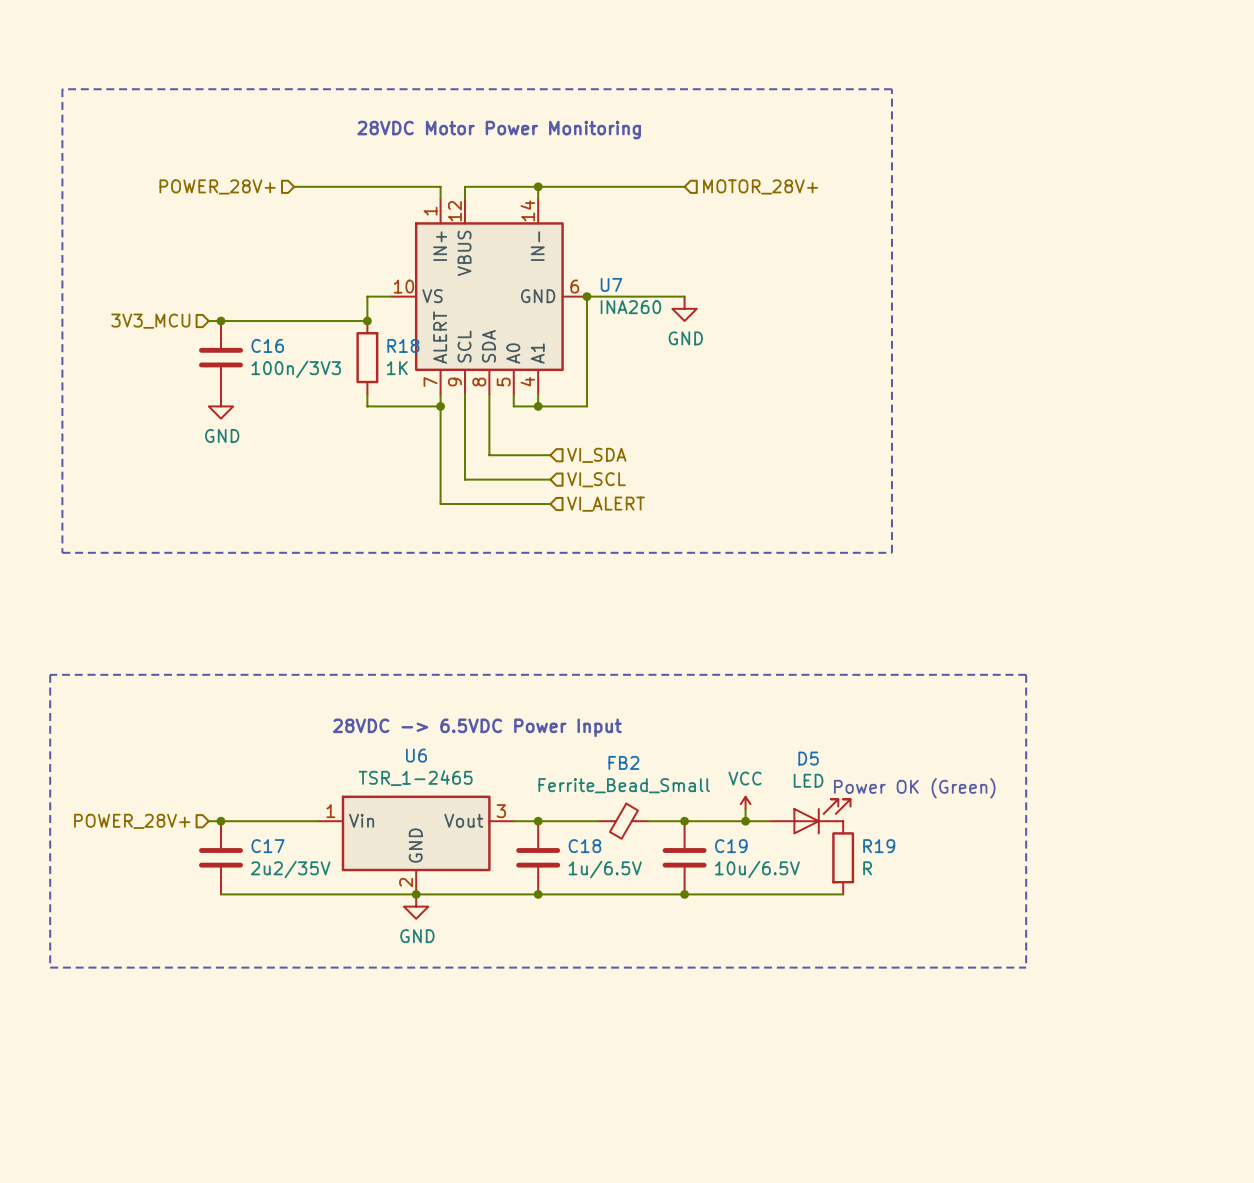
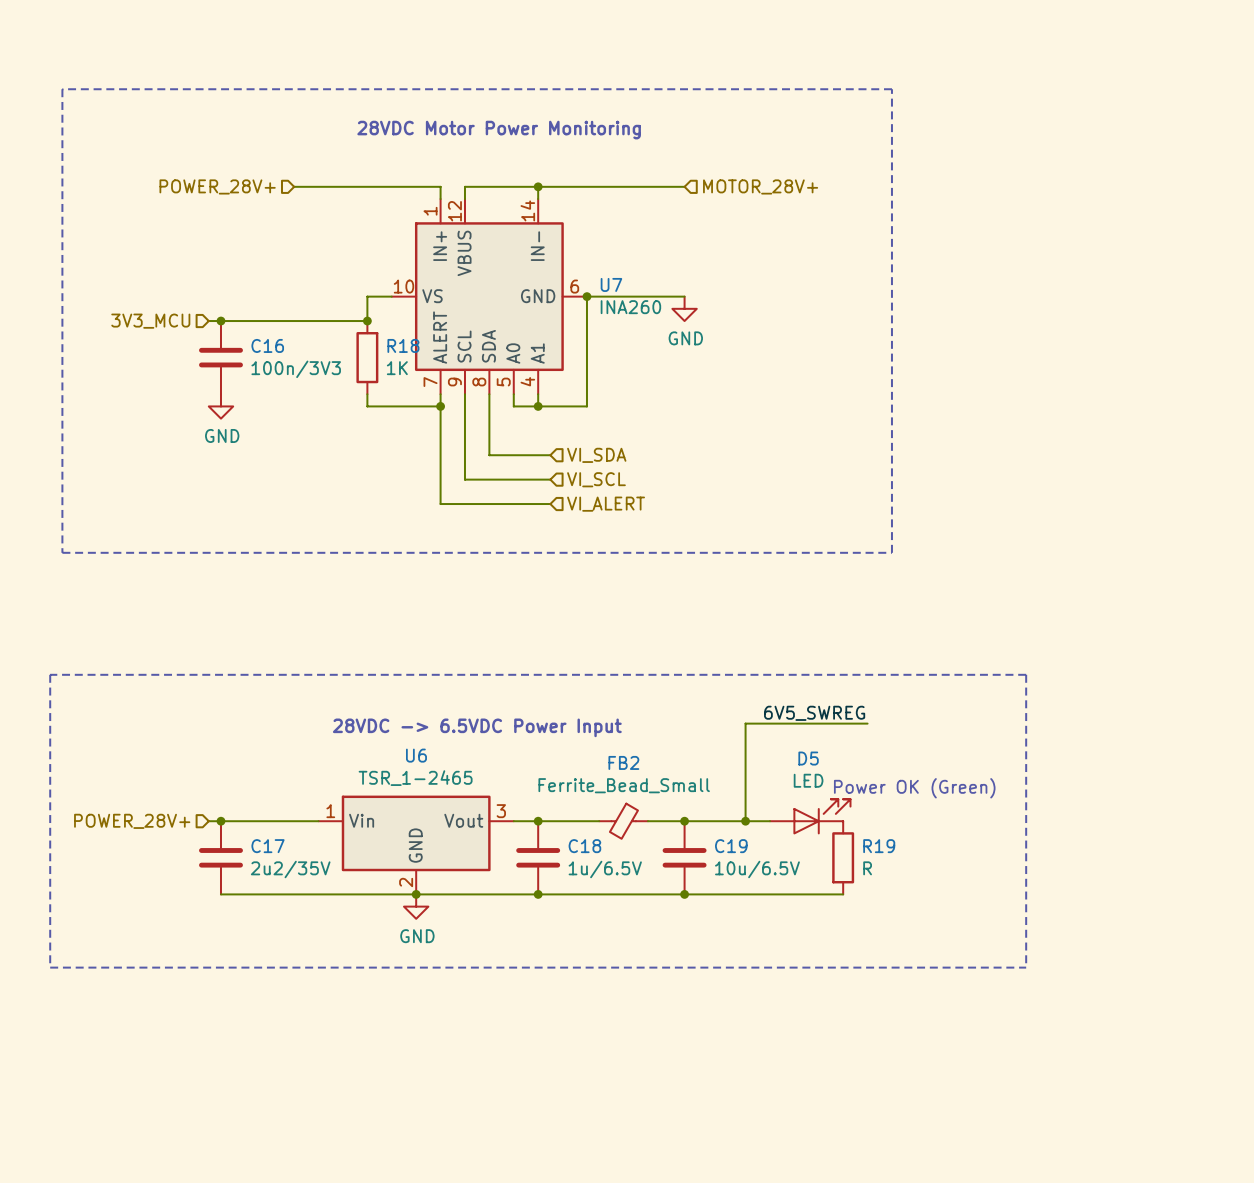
label: none -> 6V5_SWREG (814, 713)
wire: none -> (867, 723) (745, 723) (745, 809)
power symbol: VCC (745, 802) -> none

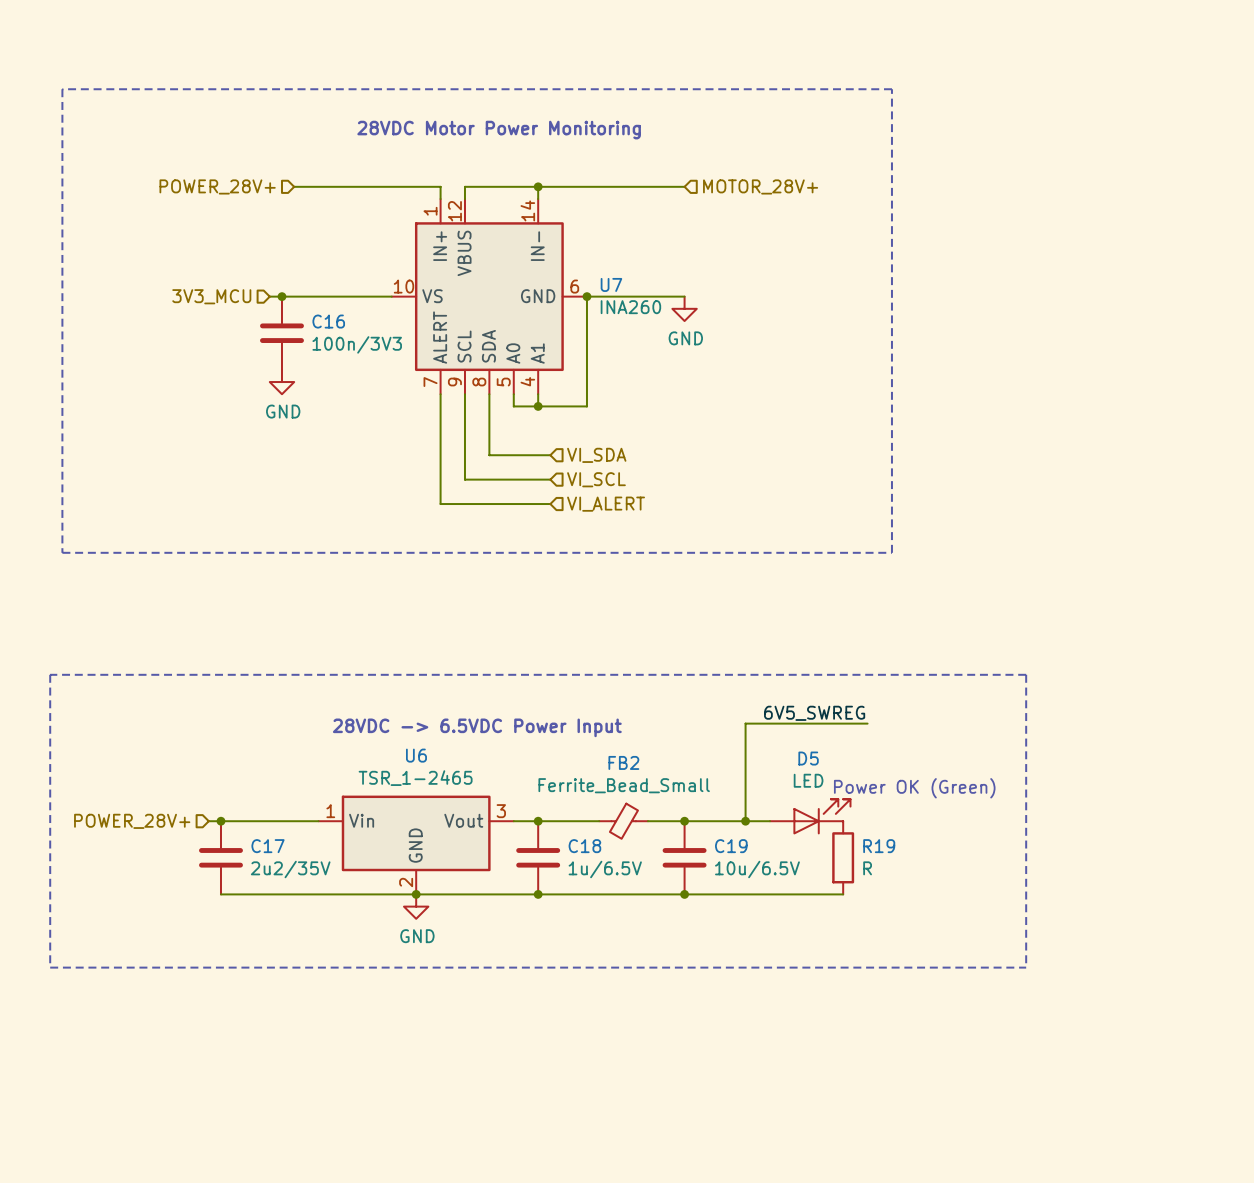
junction: none -> (281, 296)
wire: (367, 296) (367, 321) (208, 321) -> (367, 296) (269, 296)
hierarchical label position: 3V3_MCU (150, 321) -> 3V3_MCU (211, 296)
junction: (220, 321) -> none
junction: (367, 321) -> none
C16 position: (220, 357) -> (281, 333)
R18: 1K (367, 357) -> none
wire: (367, 394) (367, 406) (440, 406) -> none
power symbol position: GND (220, 406) -> GND (281, 382)
junction: (440, 406) -> none

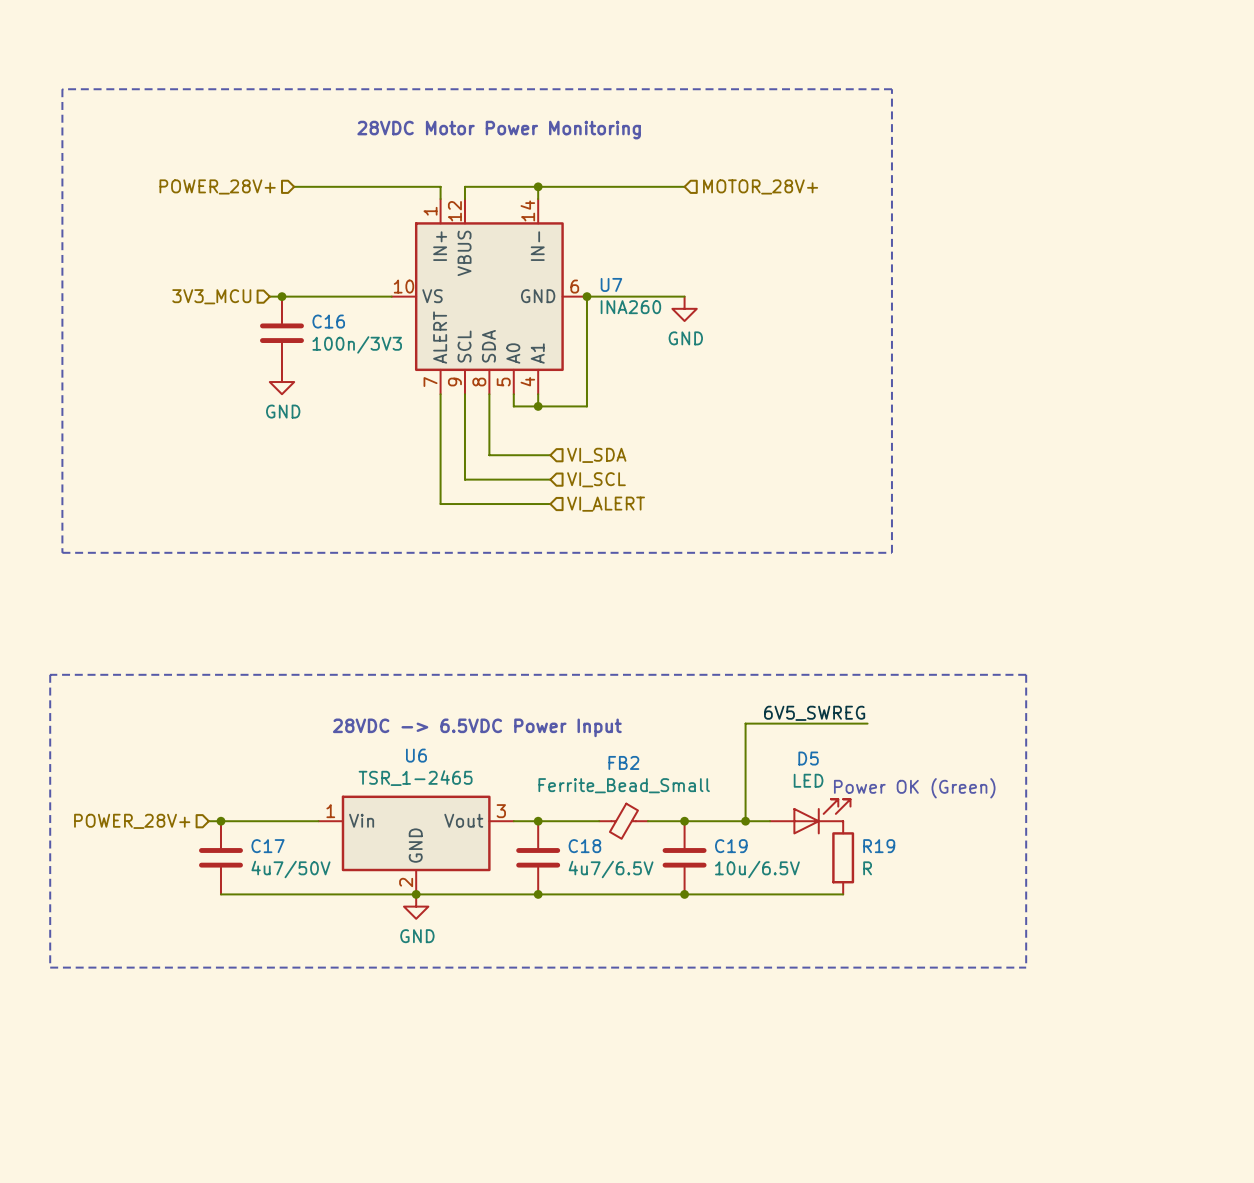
C17 value: 2u2/35V (290, 869) -> 4u7/50V (290, 869)
C18 value: 1u/6.5V (605, 869) -> 4u7/6.5V (611, 869)

